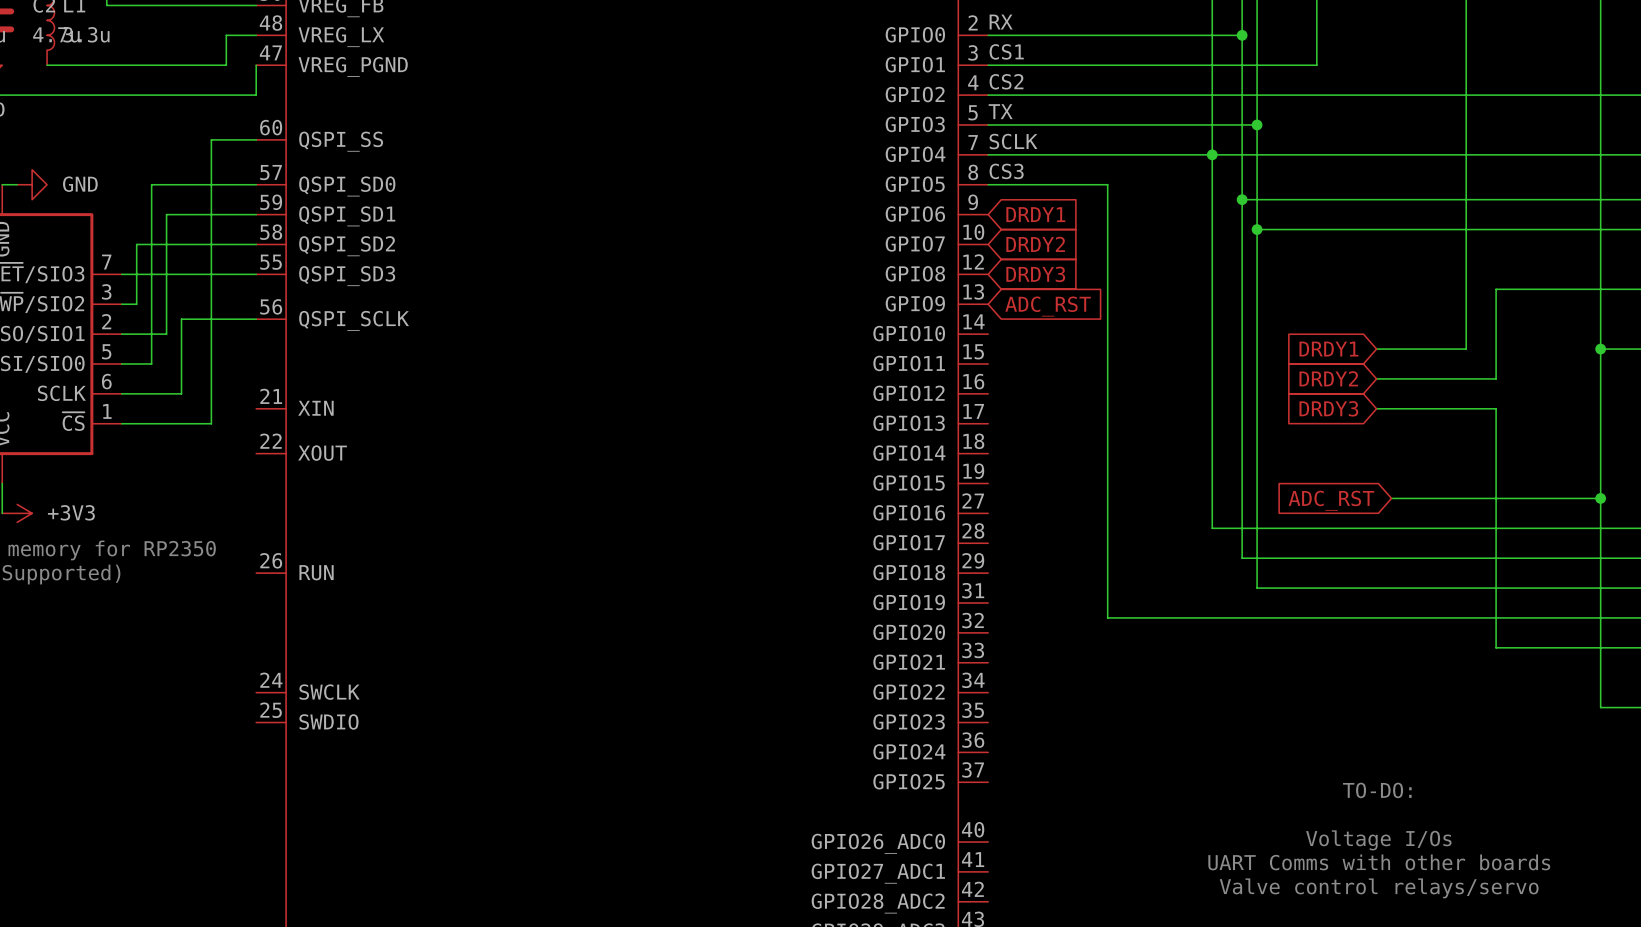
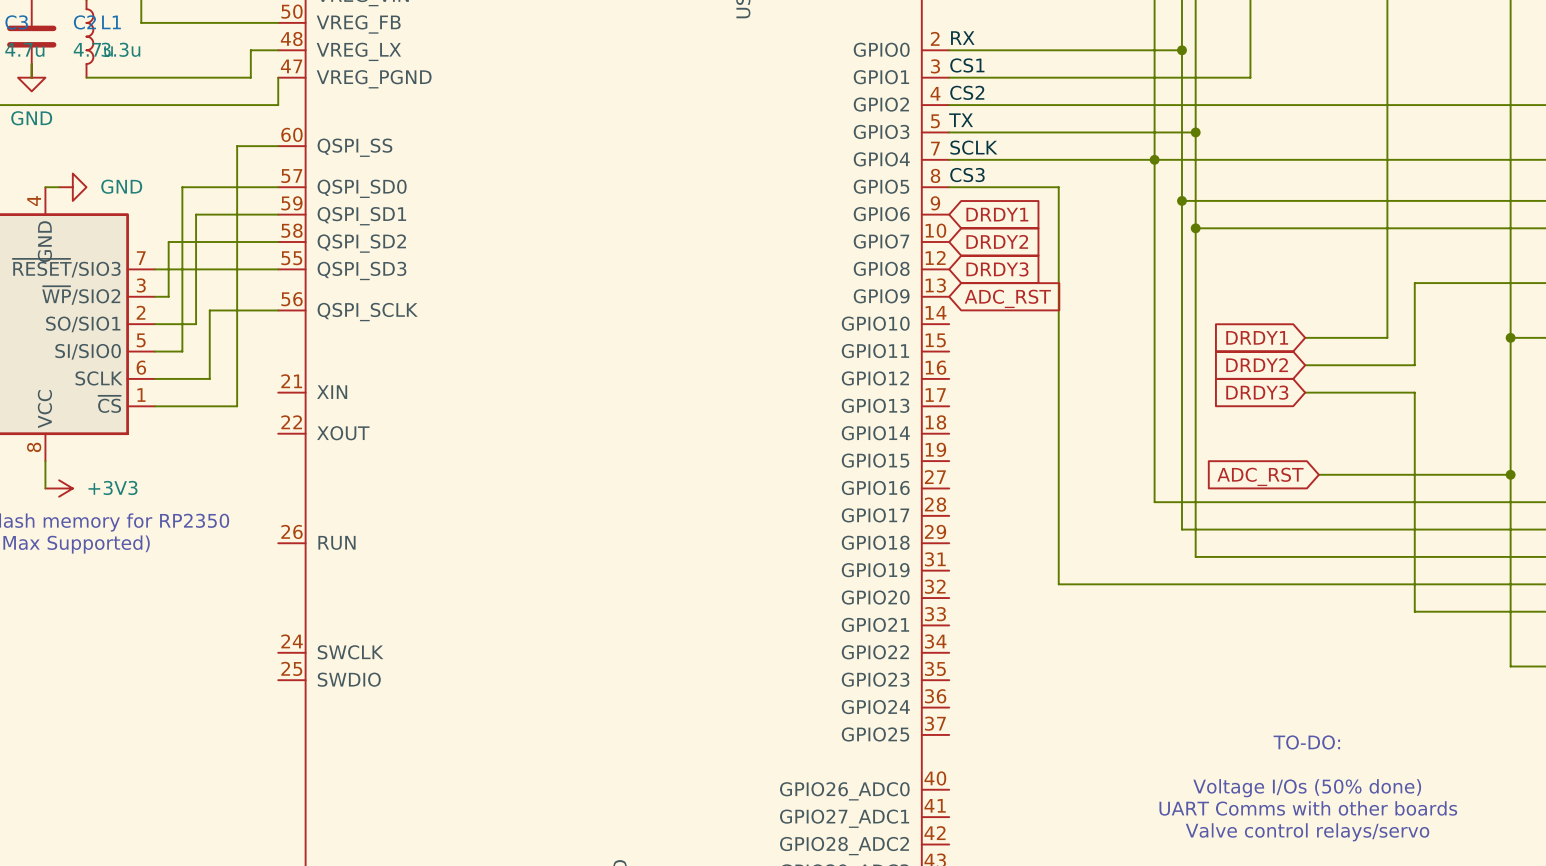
text: Voltage I/Os (1378, 840) -> Voltage I/Os (50% done) (1307, 788)

